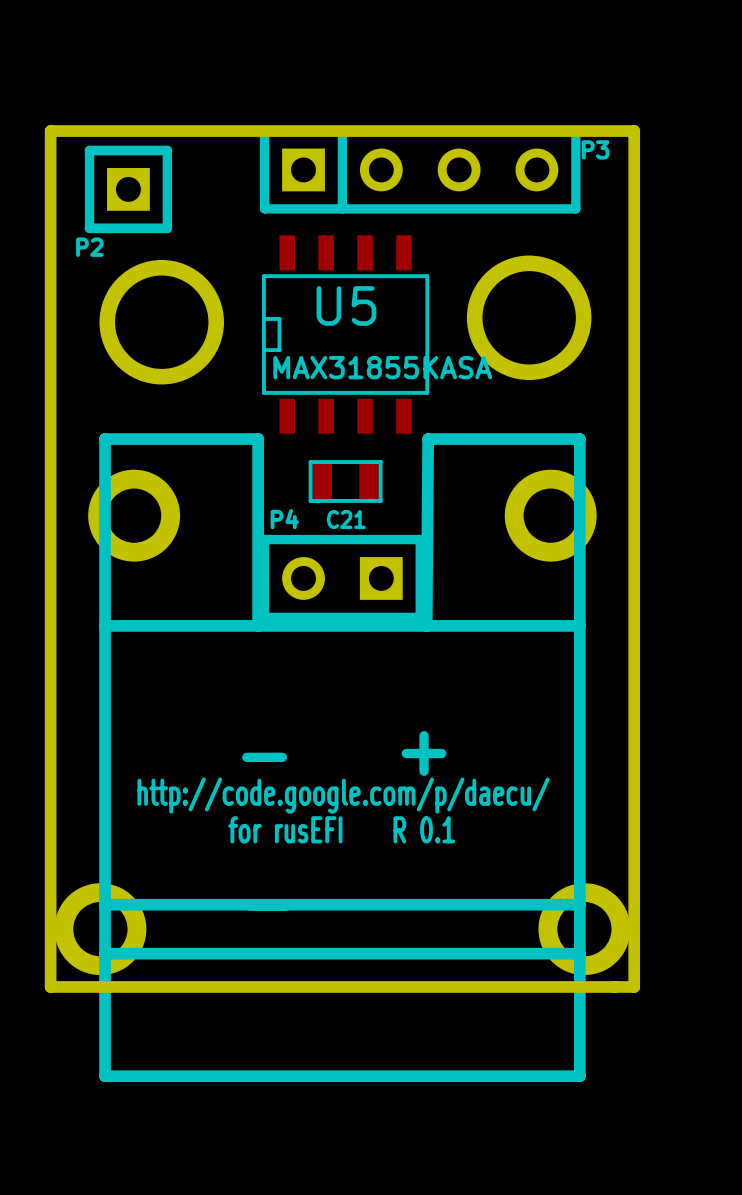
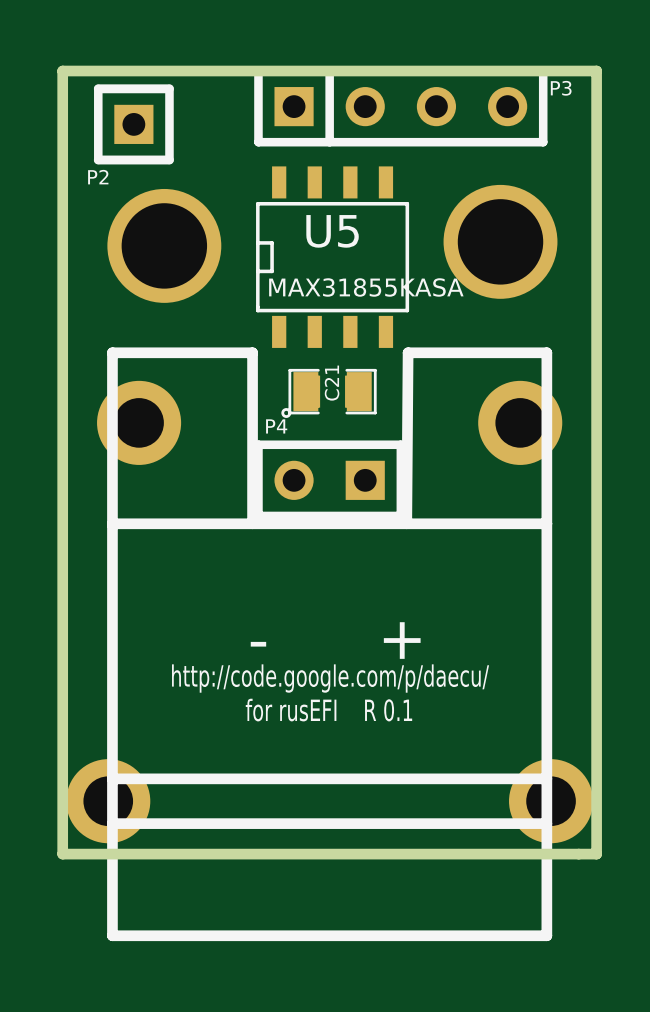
C21 footprint: [308, 460, 383, 503] -> [281, 368, 377, 418]
C21 name rotation: 0° (346, 519) -> 90° counterclockwise (332, 383)

